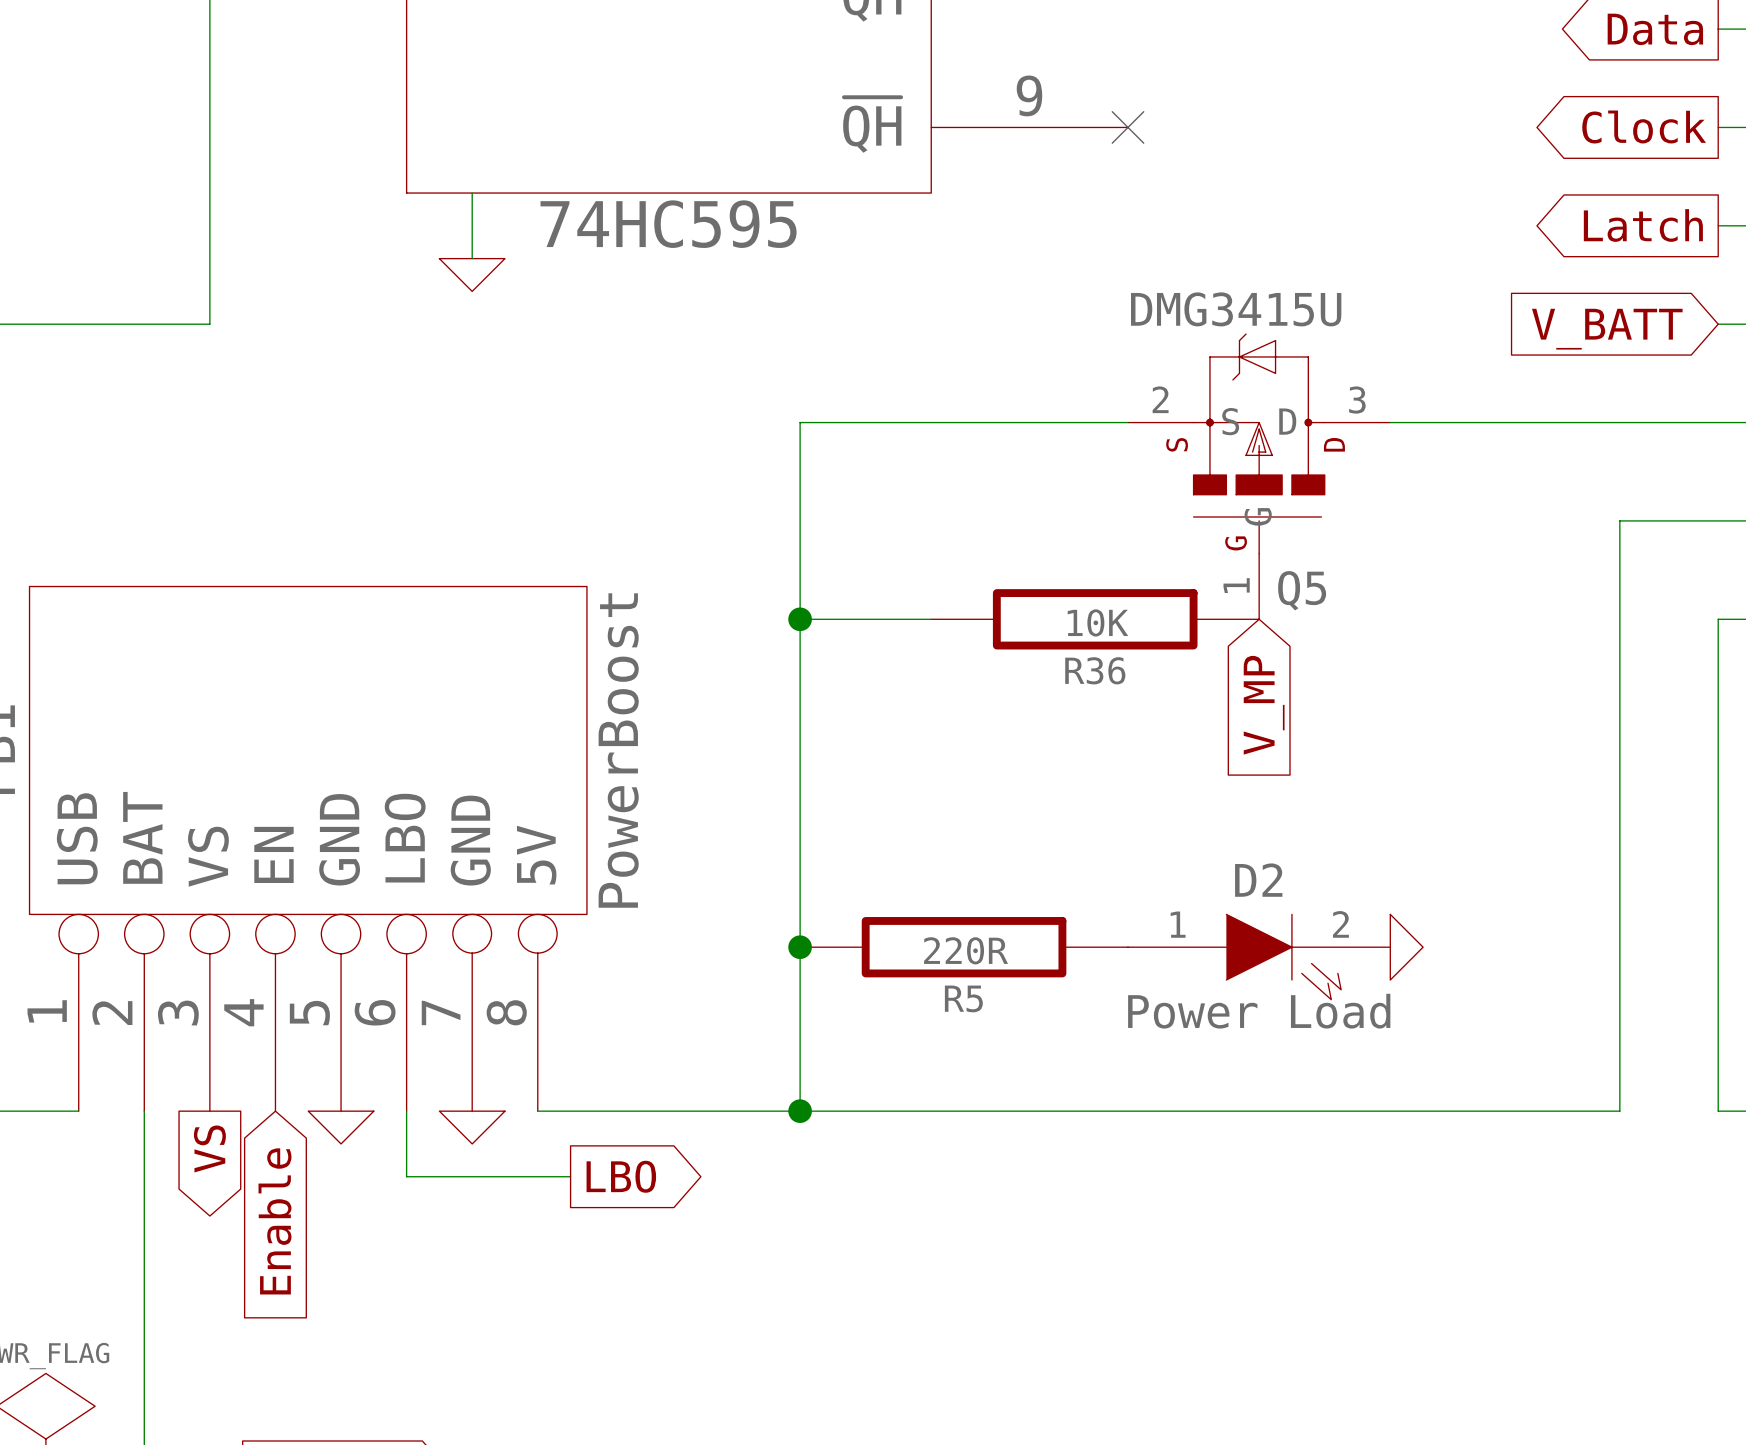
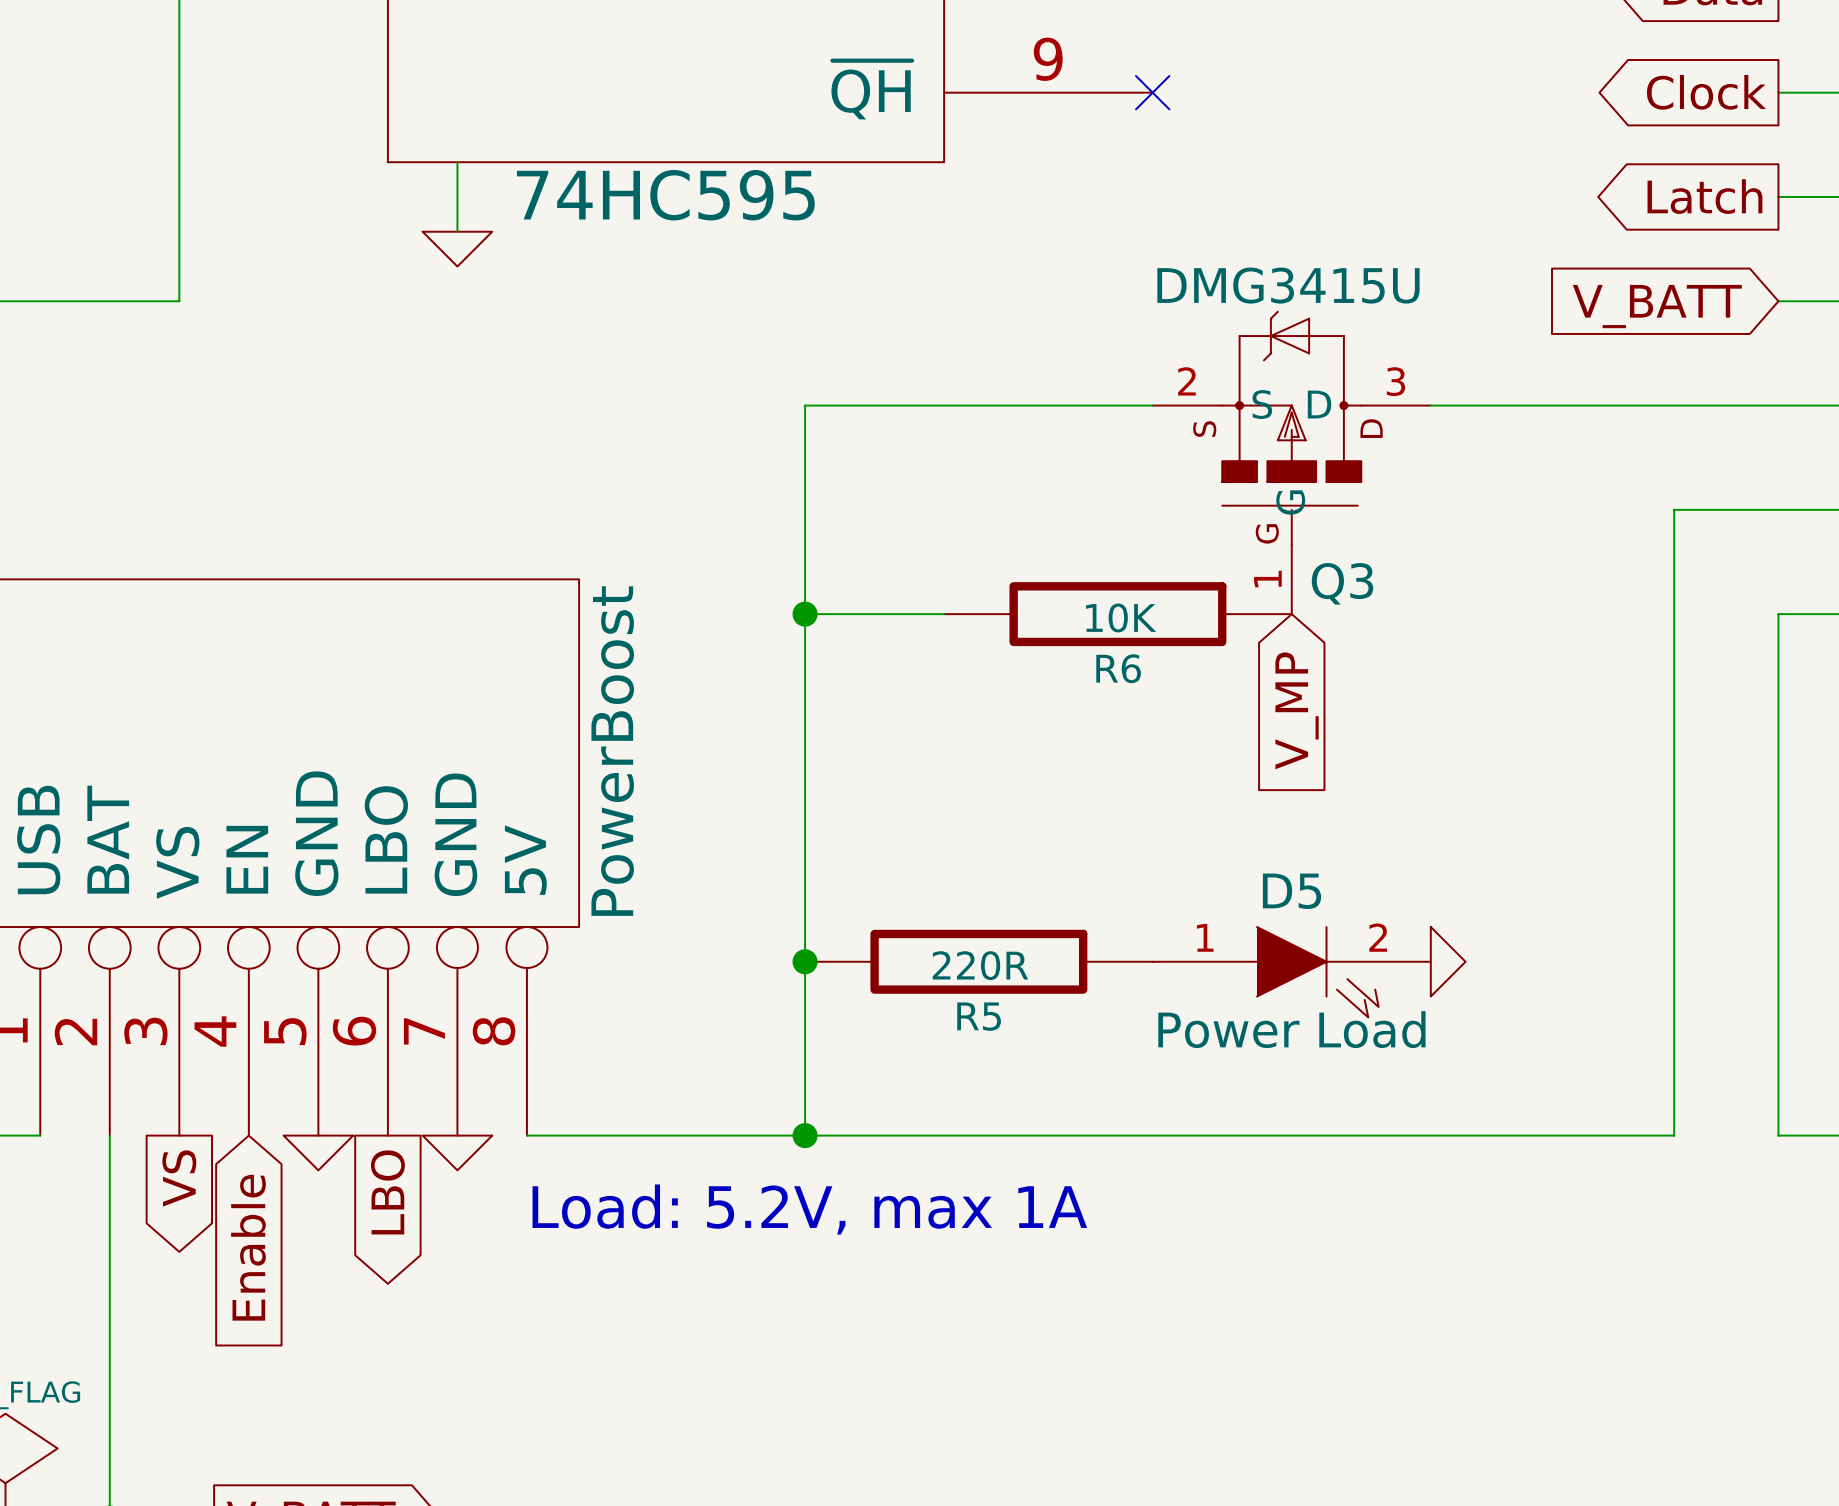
Q5 name: Q5 (1302, 590) -> Q3 (1342, 583)
R36 name: R36 (1095, 670) -> R6 (1118, 668)
D2 name: D2 (1258, 880) -> D5 (1292, 891)
wire: (406, 1111) (406, 1176) (570, 1176) -> none
global label rotation: 0° (621, 1176) -> 90° clockwise (387, 1192)
global label position: LBO (621, 1176) -> LBO (387, 1192)
text: none -> Load: 5.2V, max 1A (809, 1209)

